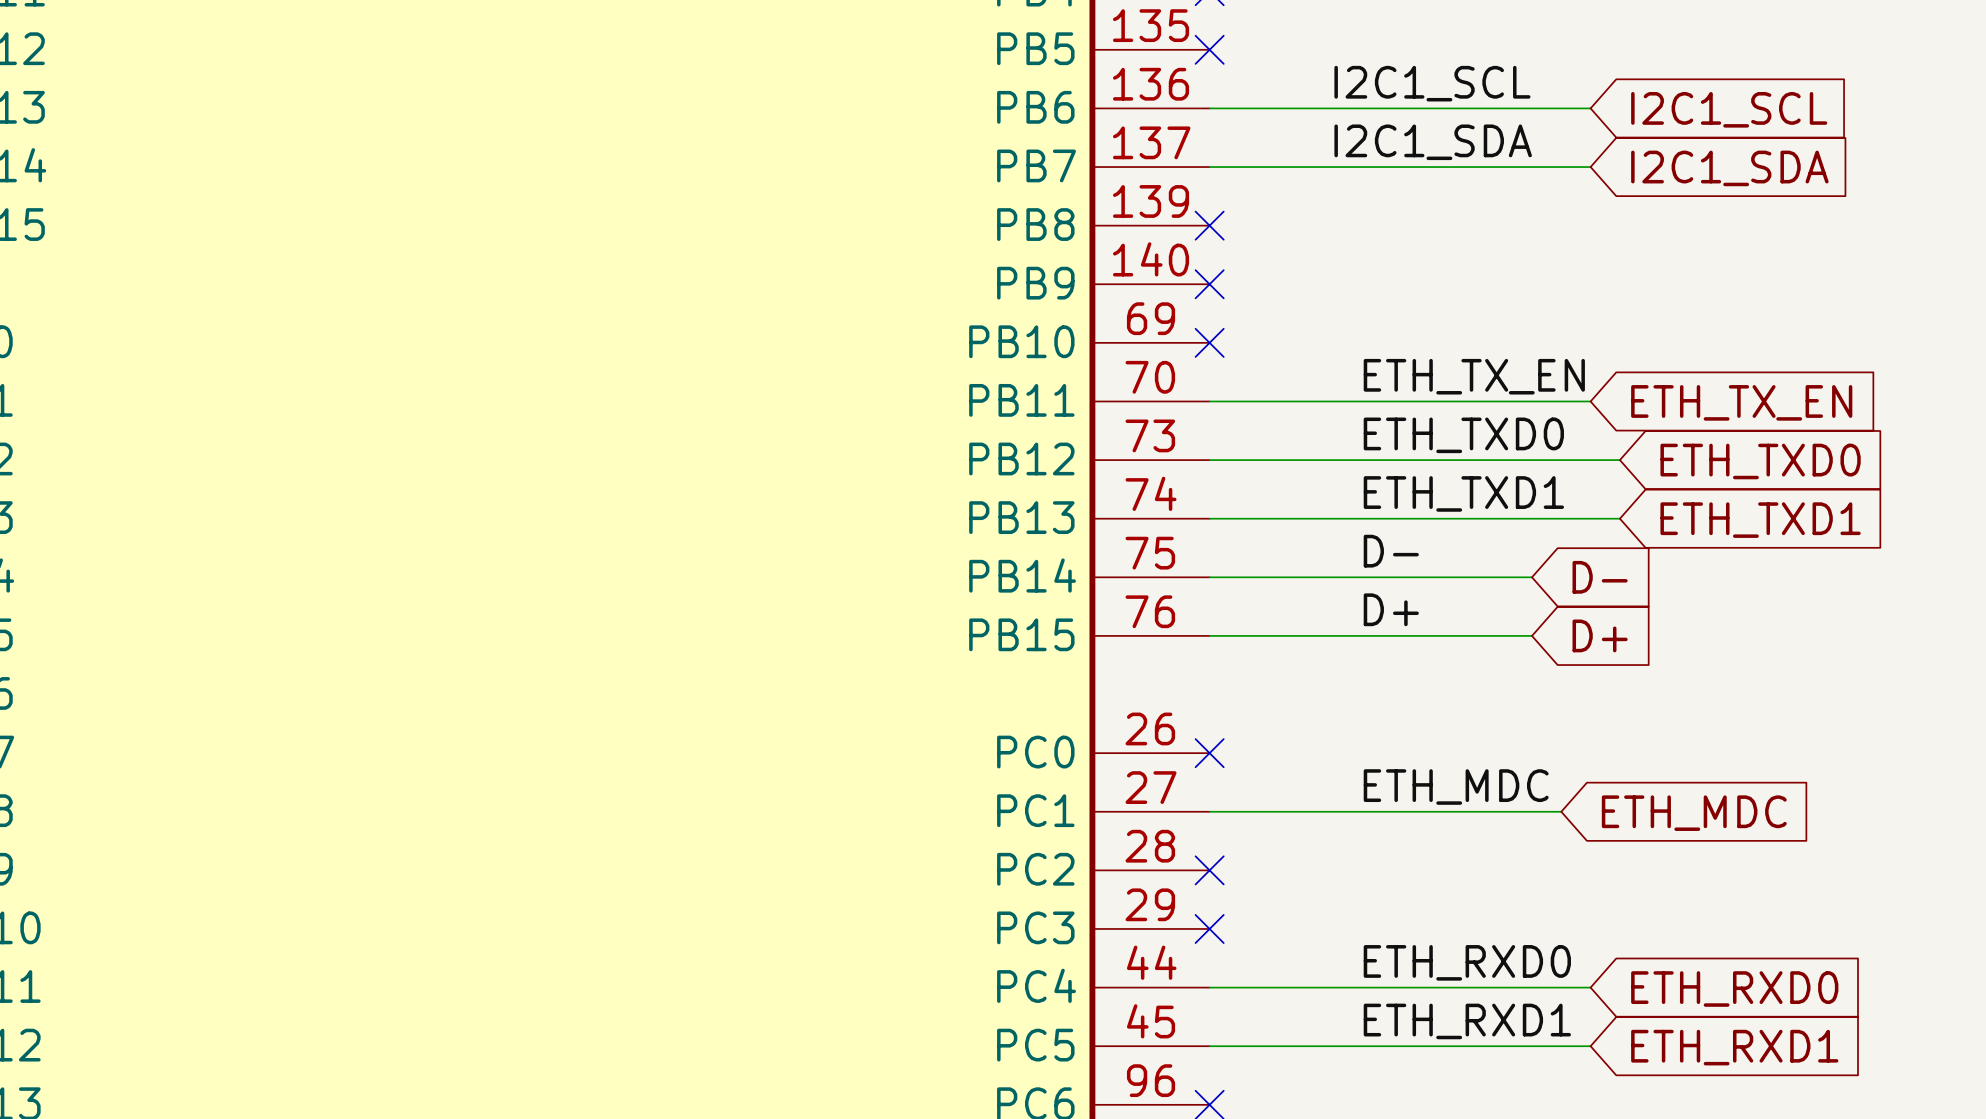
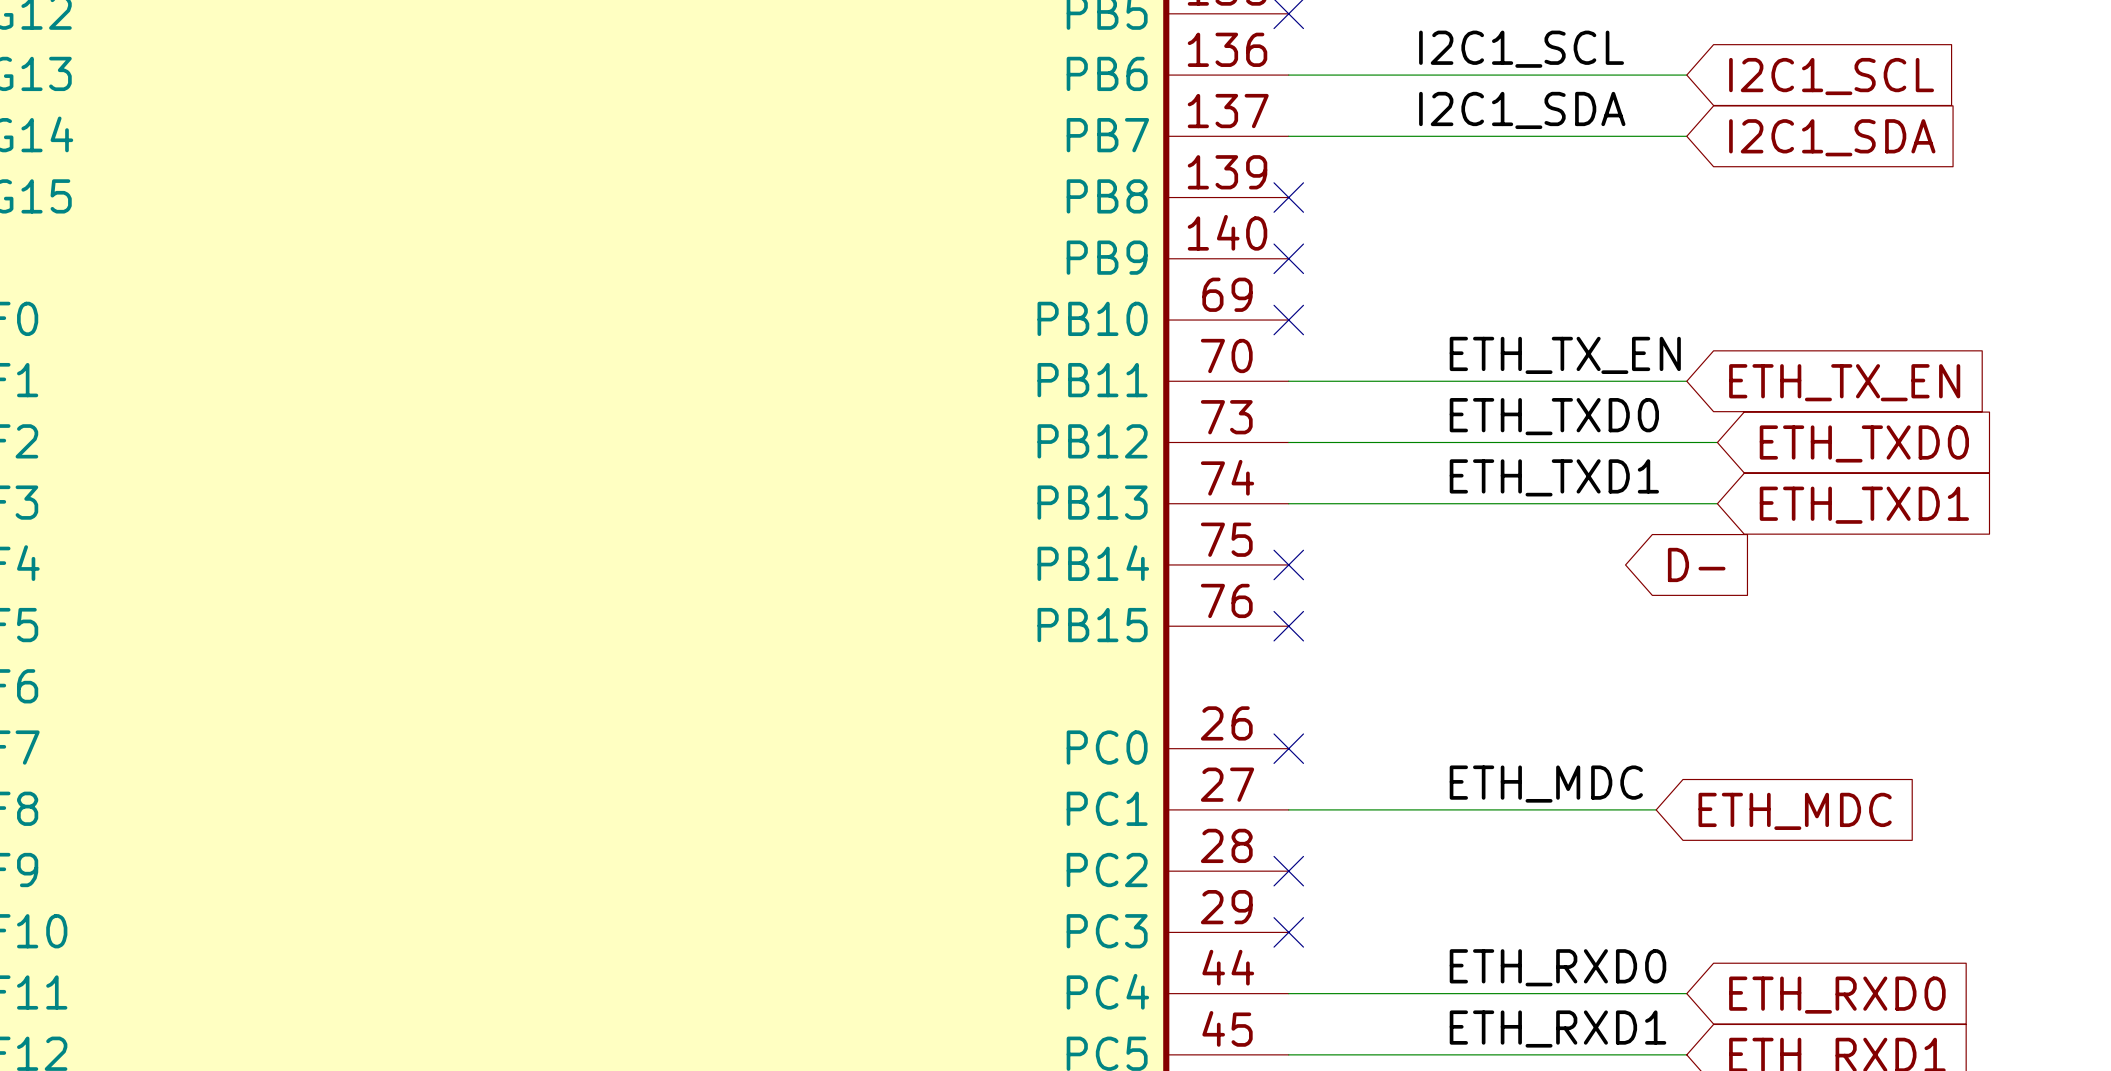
label: D- (1391, 551) -> none
wire: (1209, 577) (1532, 577) -> none
no-connect mark: none -> (1288, 564)
label: D+ (1391, 609) -> none
wire: (1209, 635) (1532, 635) -> none
no-connect mark: none -> (1288, 626)
global label: D+ (1600, 635) -> none

